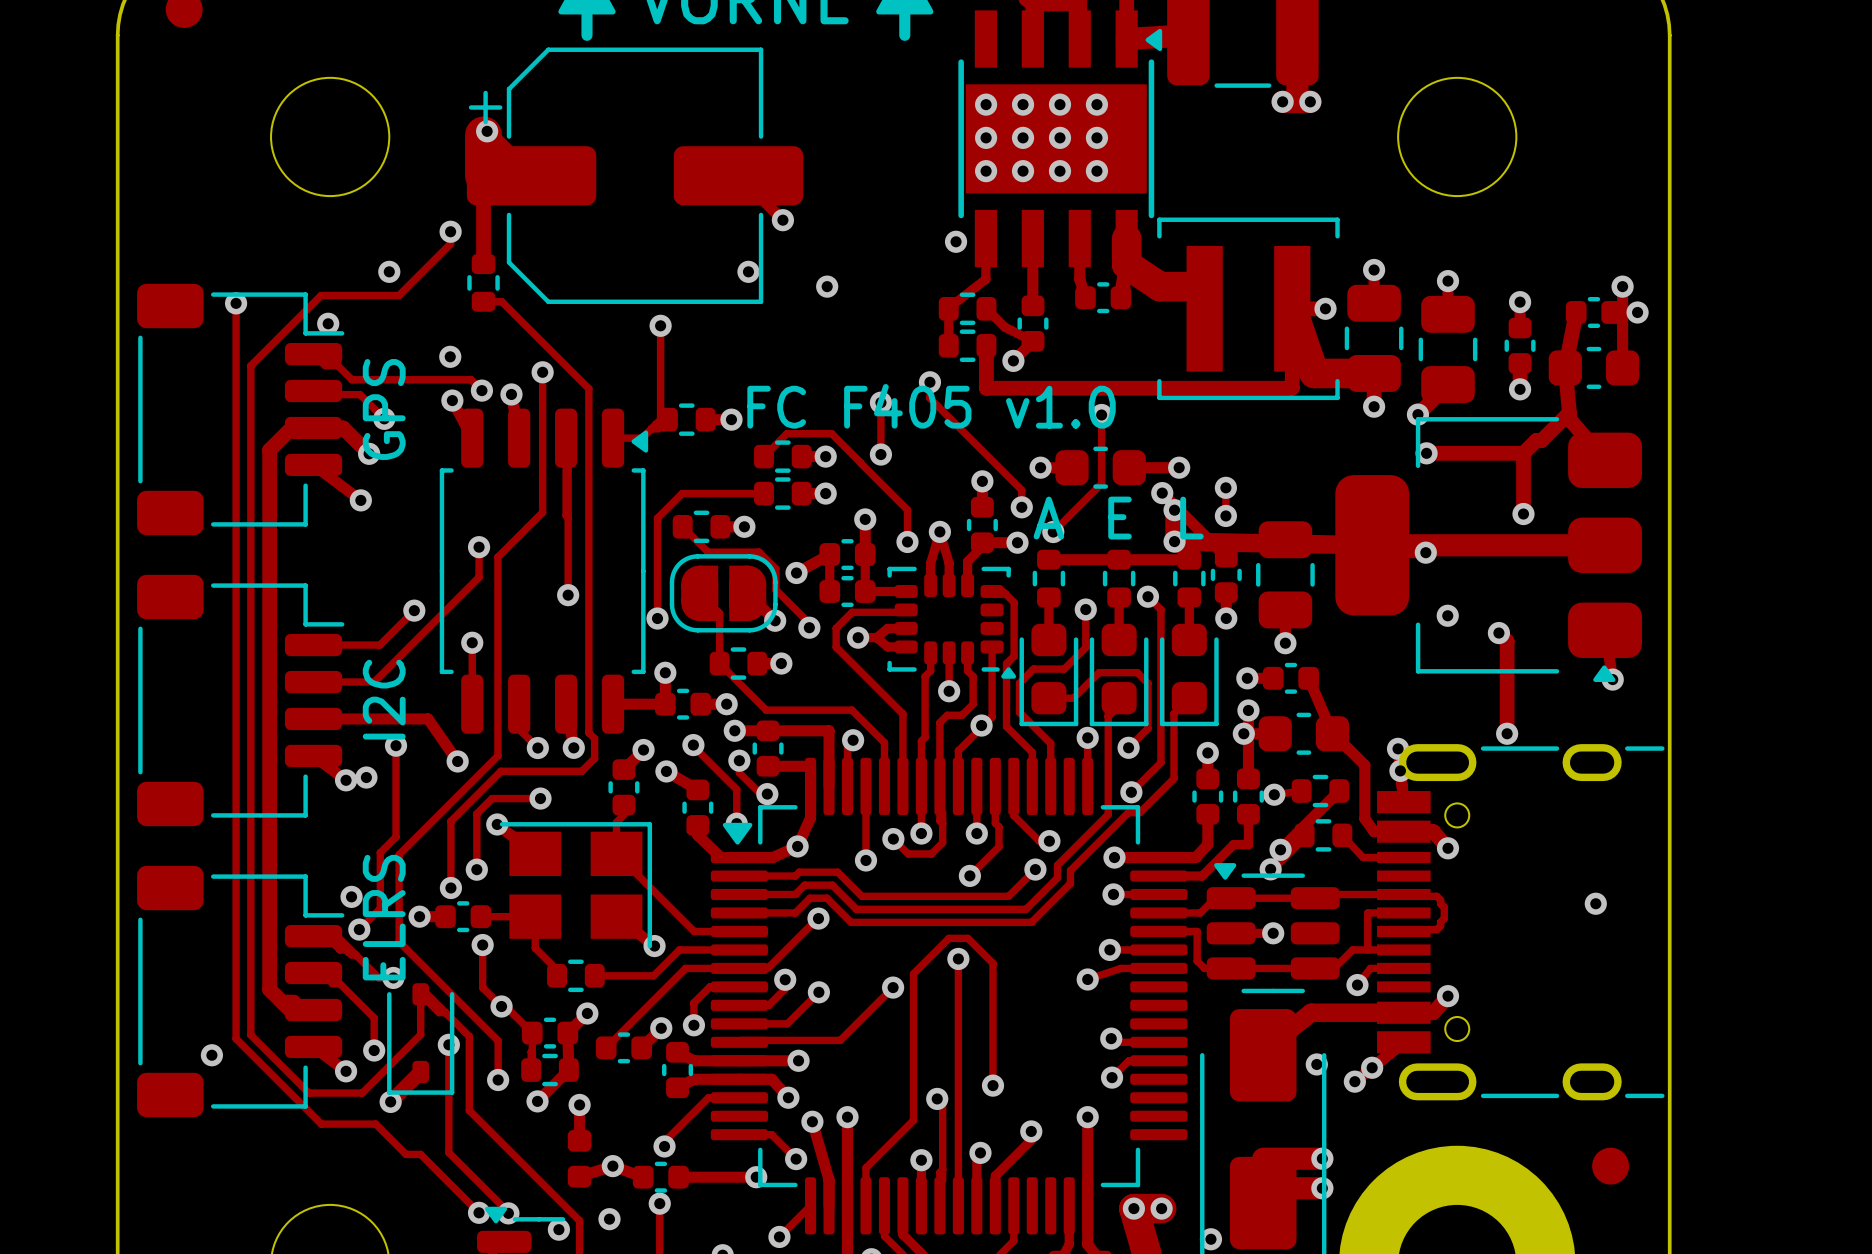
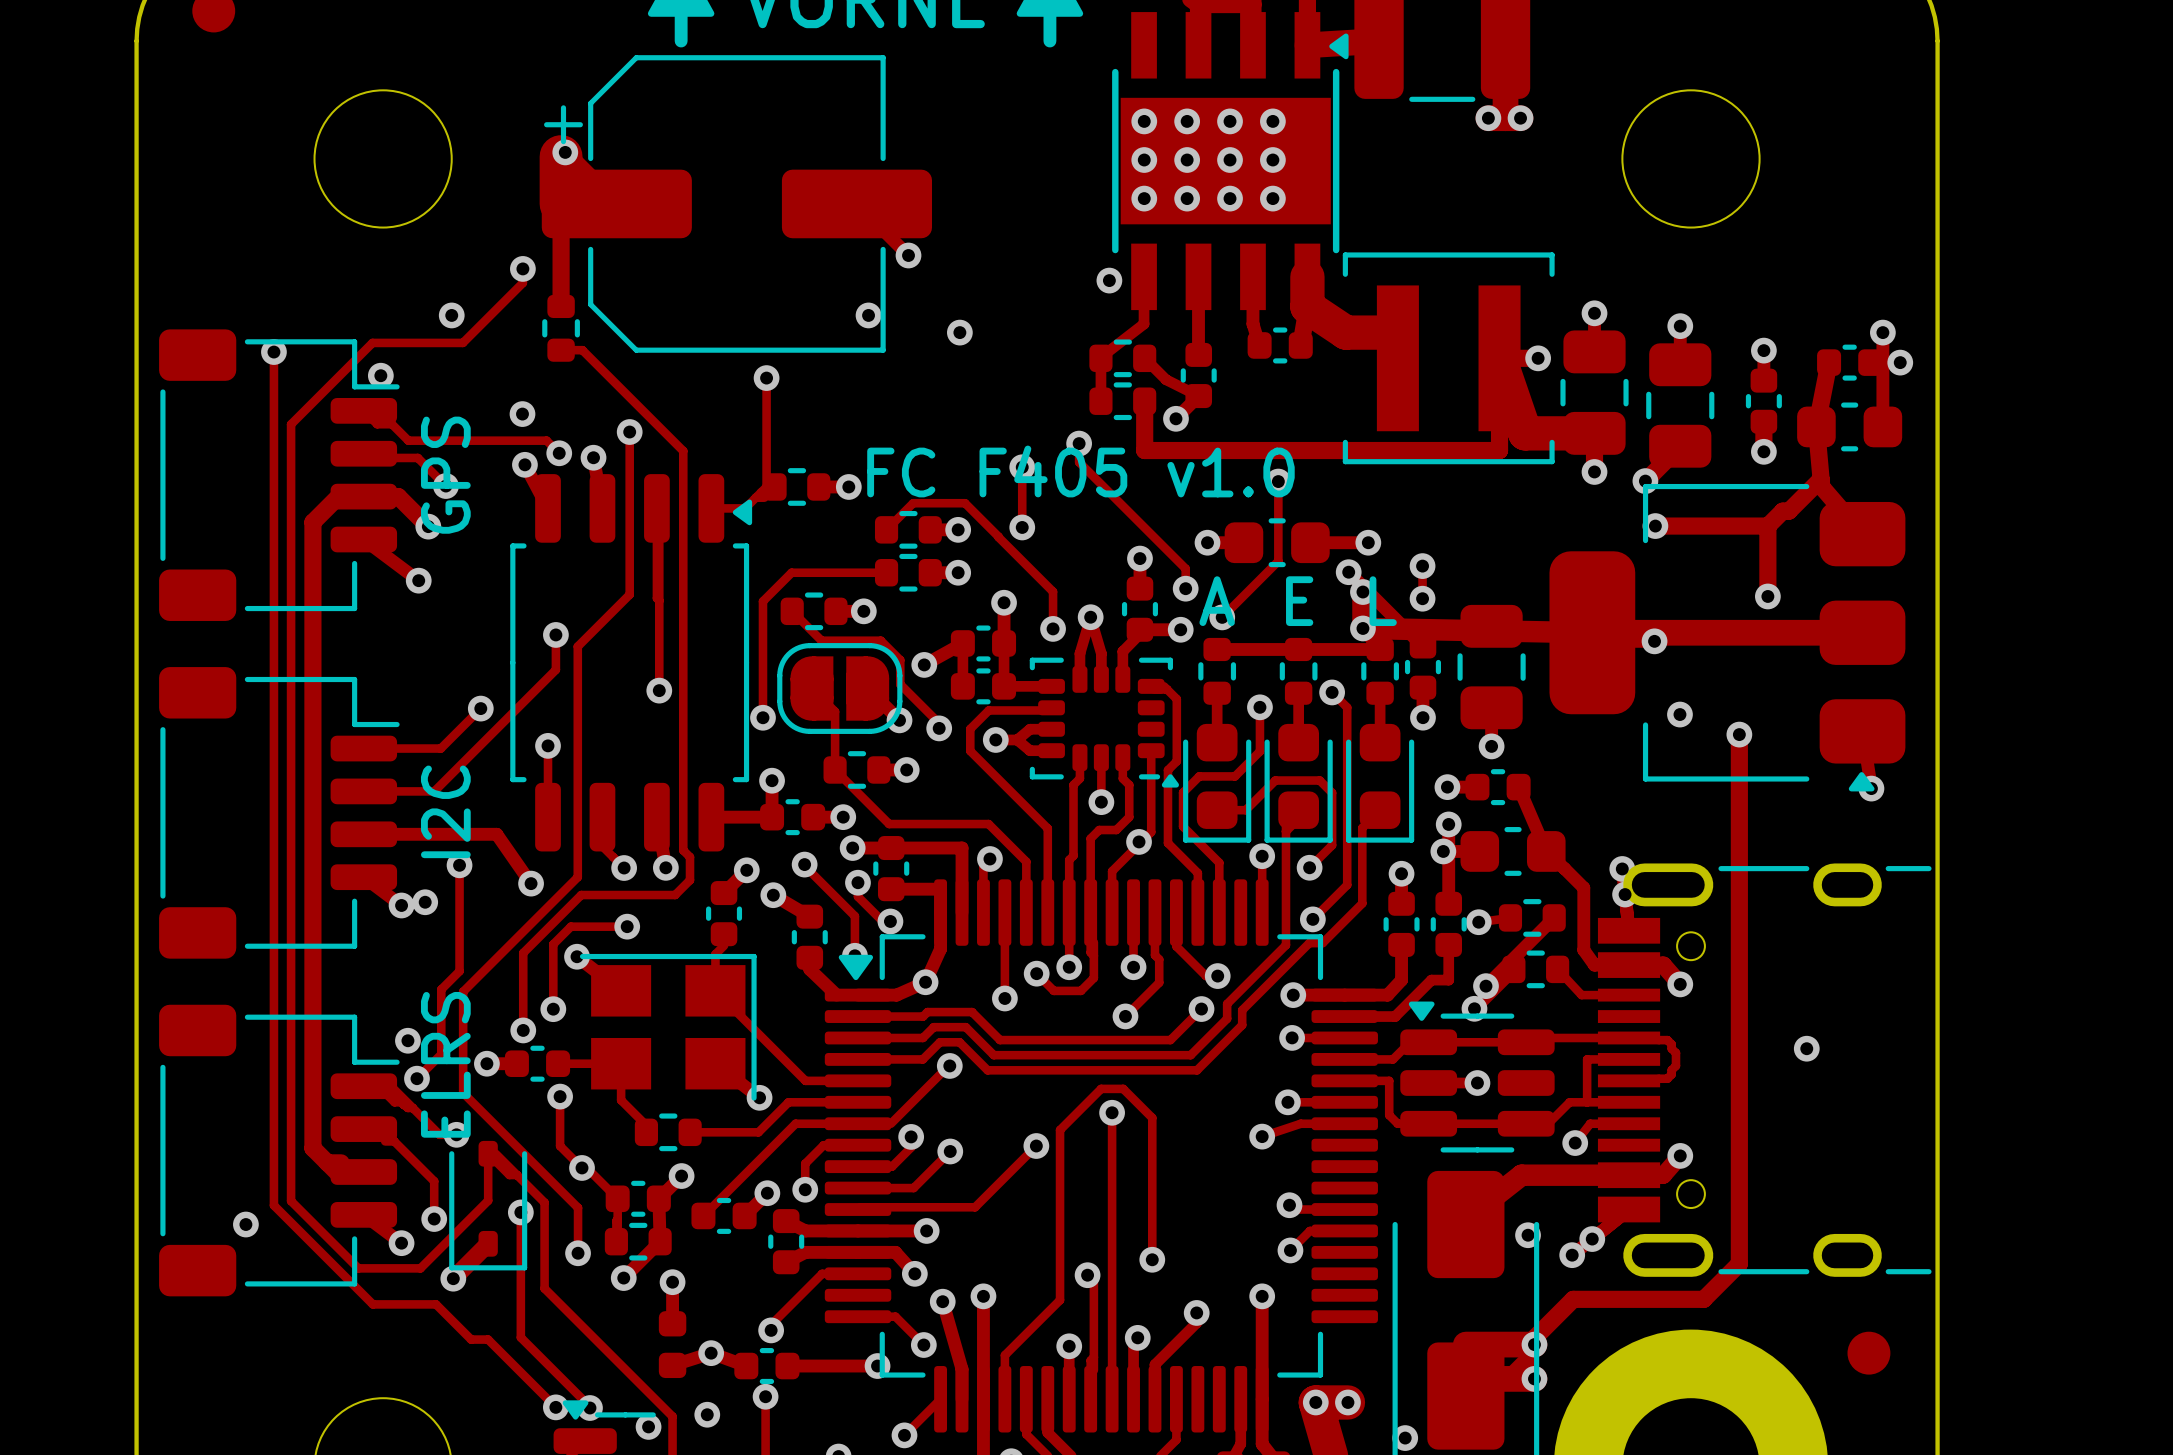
track: (1498, 633) (1507, 641) (1507, 733) -> (1739, 734) (1739, 1263) (1703, 1299) (1573, 1299) (1528, 1344) (1528, 1359) (1508, 1378)
via: (1507, 733) -> none
via position: (1595, 903) -> (1806, 1048)

